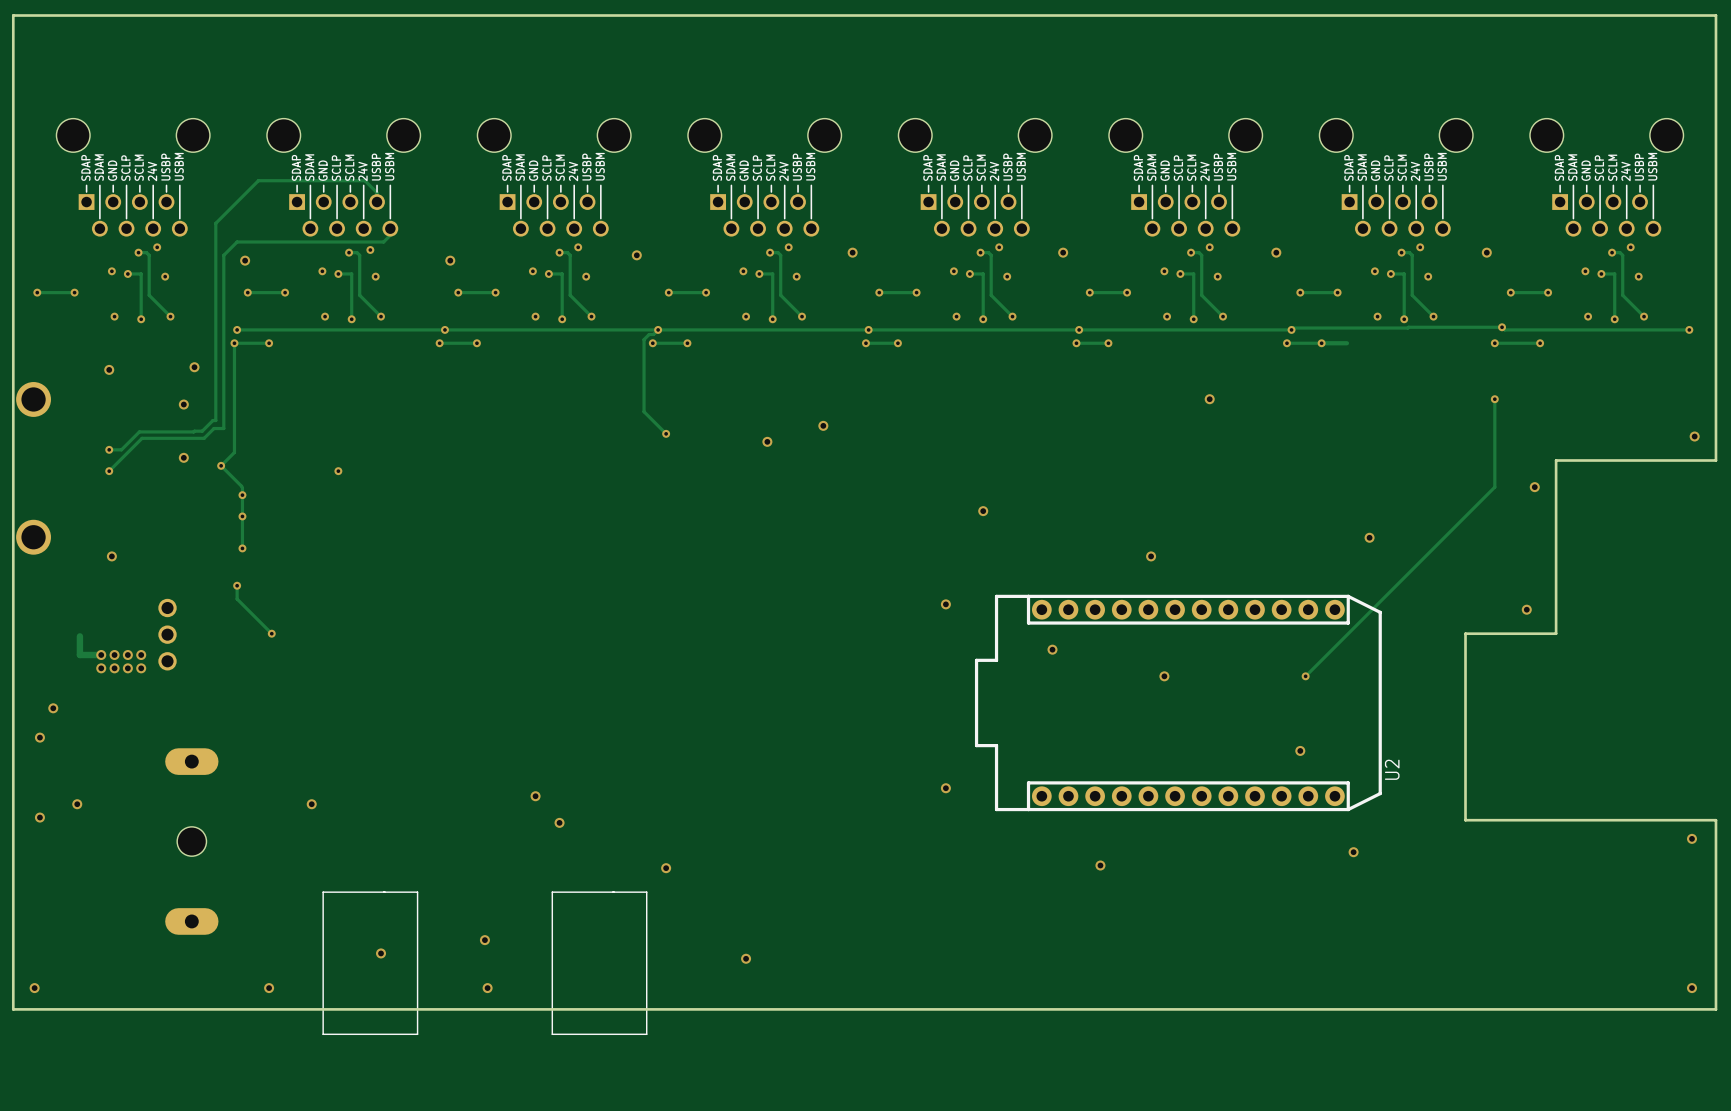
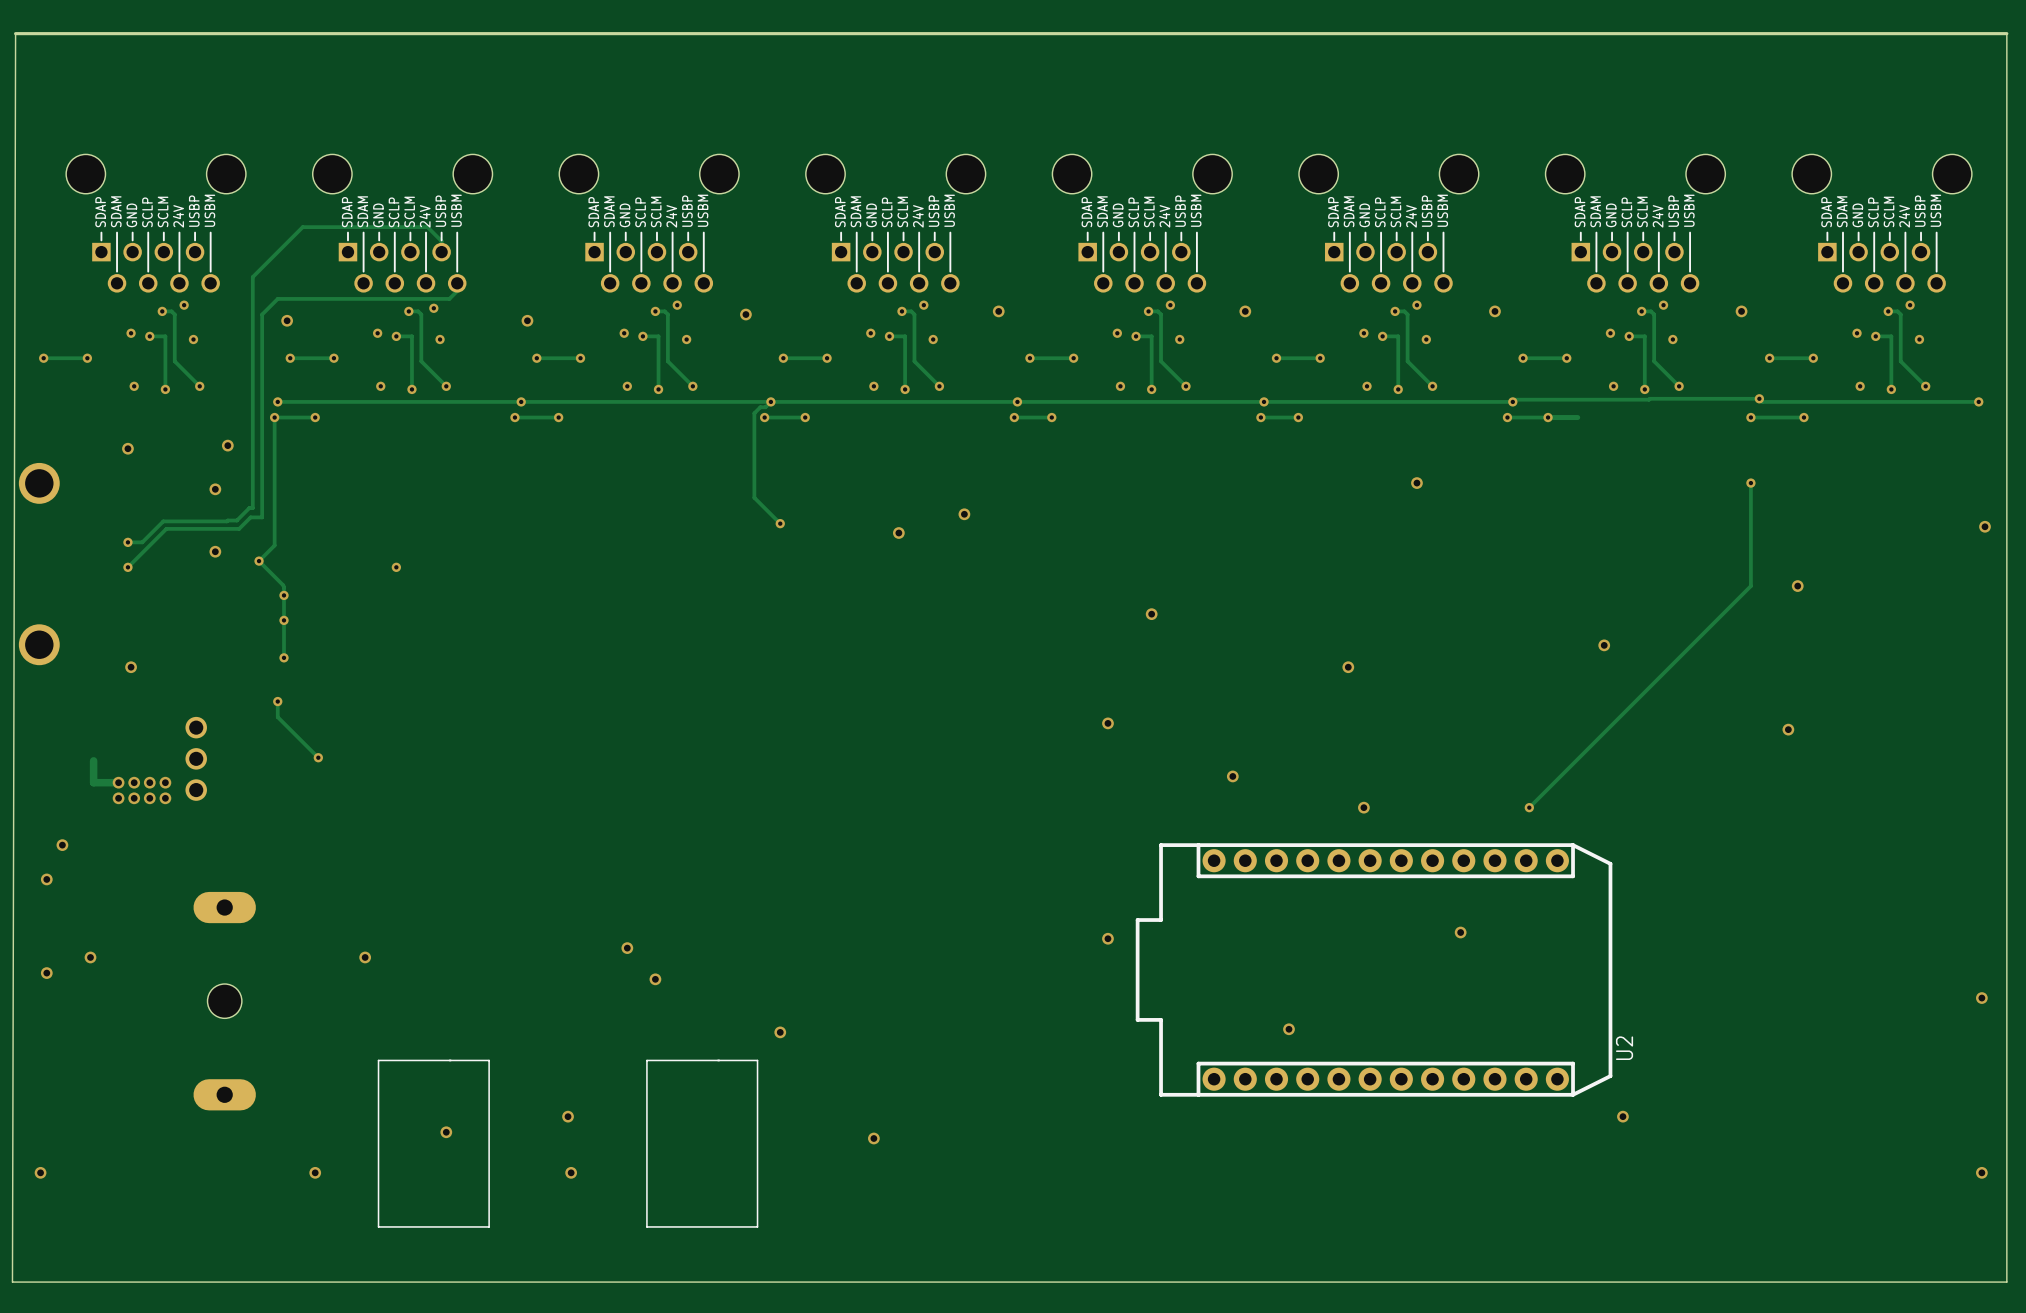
board edge: (1713, 15) (1715, 15) (1715, 460) (1556, 460) (1556, 633) (1465, 633) (1465, 820) (1715, 820) (1715, 1009) (13, 1009) (13, 15) -> (2006, 33) (2006, 1282) (12, 1282) (15, 33)
U2 position: (1178, 702) -> (1374, 969)
via position: (1300, 750) -> (1460, 932)
via: (1353, 852) -> none
via: none -> (1622, 1116)

